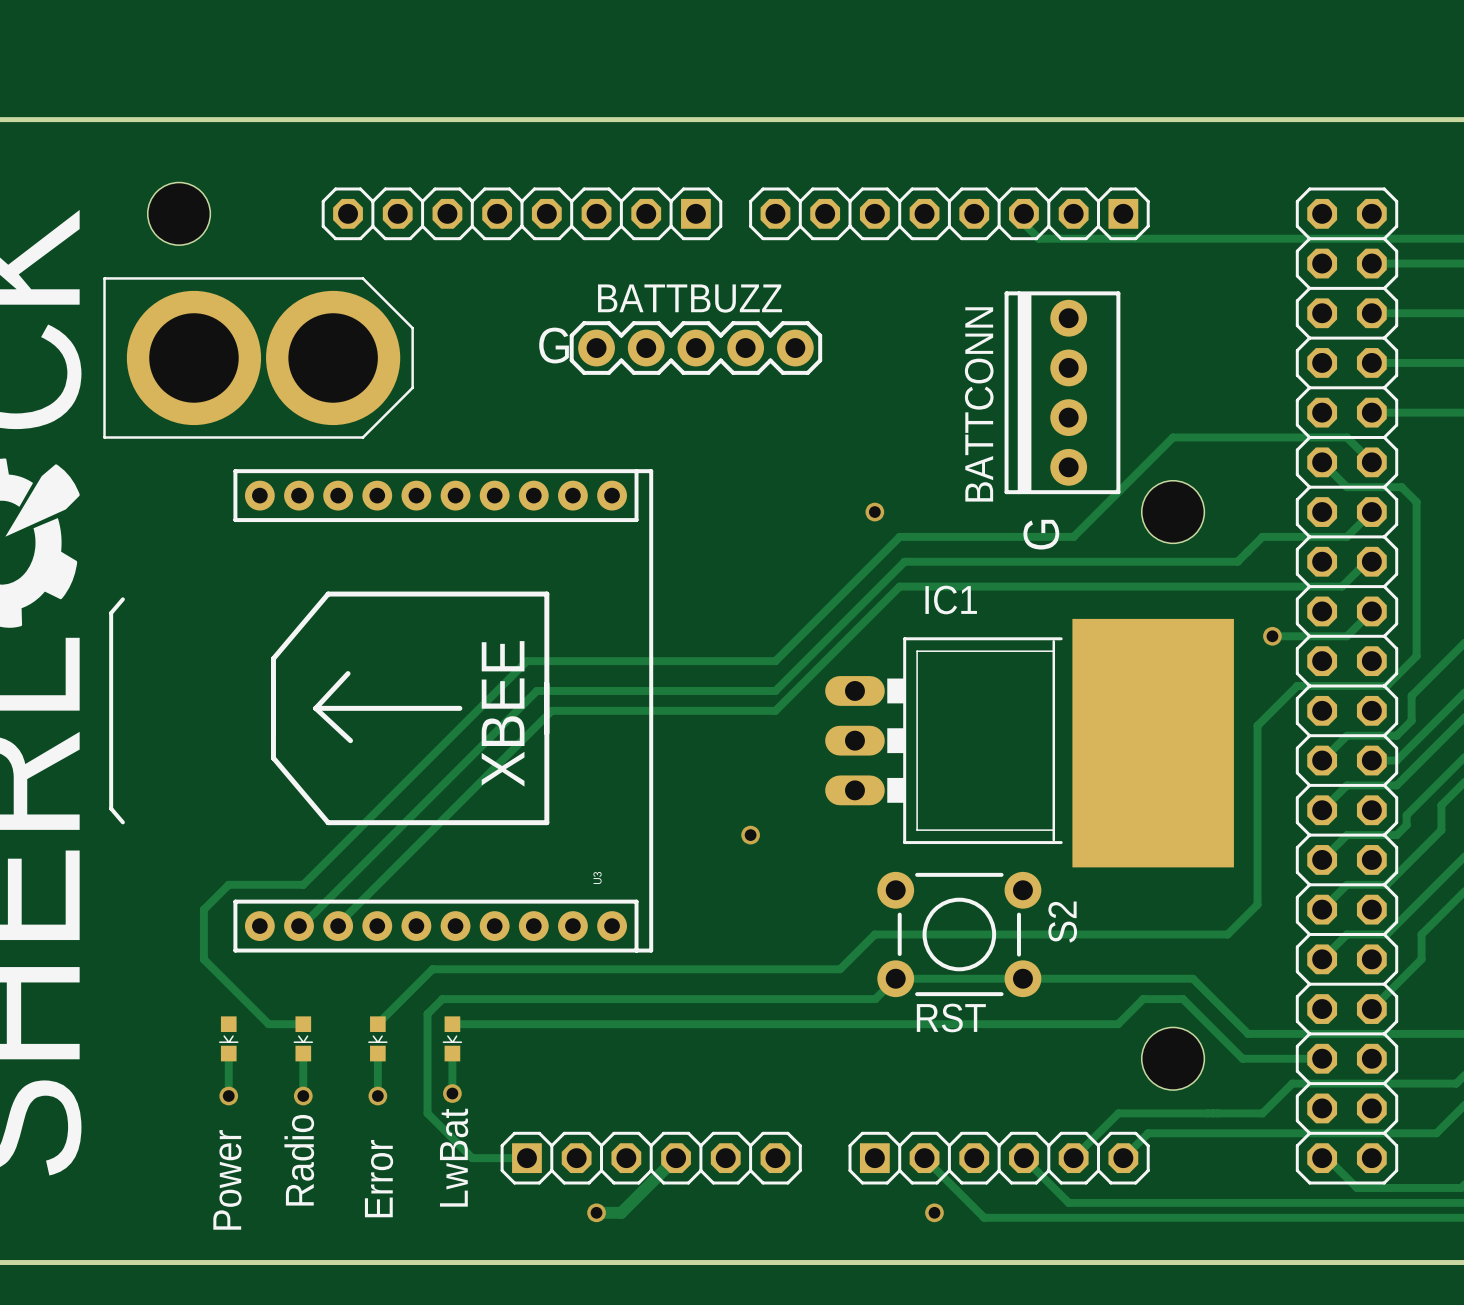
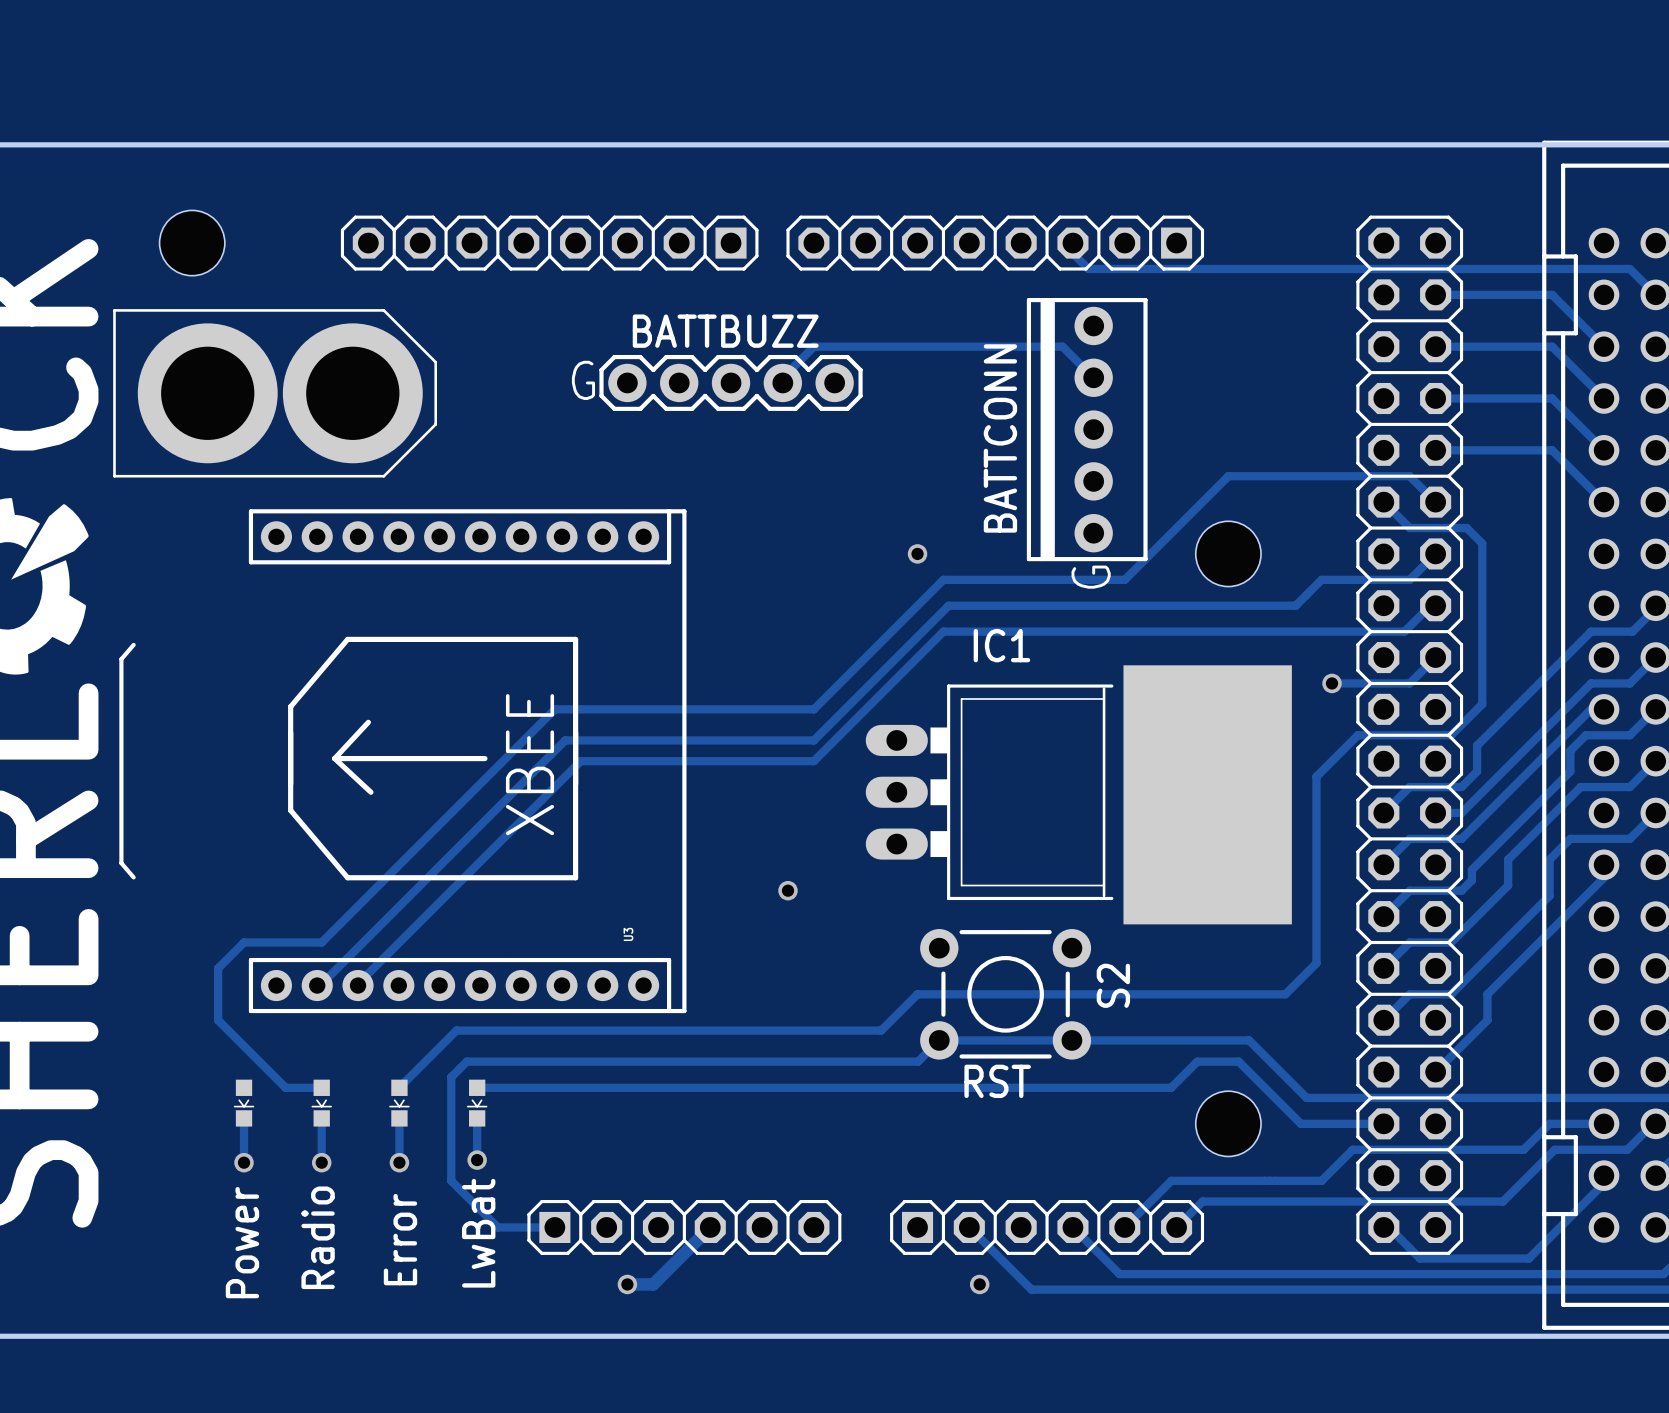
track: none -> (1093, 377) (1062, 346) (813, 346) (782, 377) (782, 382)
BATTCONN: none -> (1087, 429)
BATTCONN: (1062, 392) -> none

